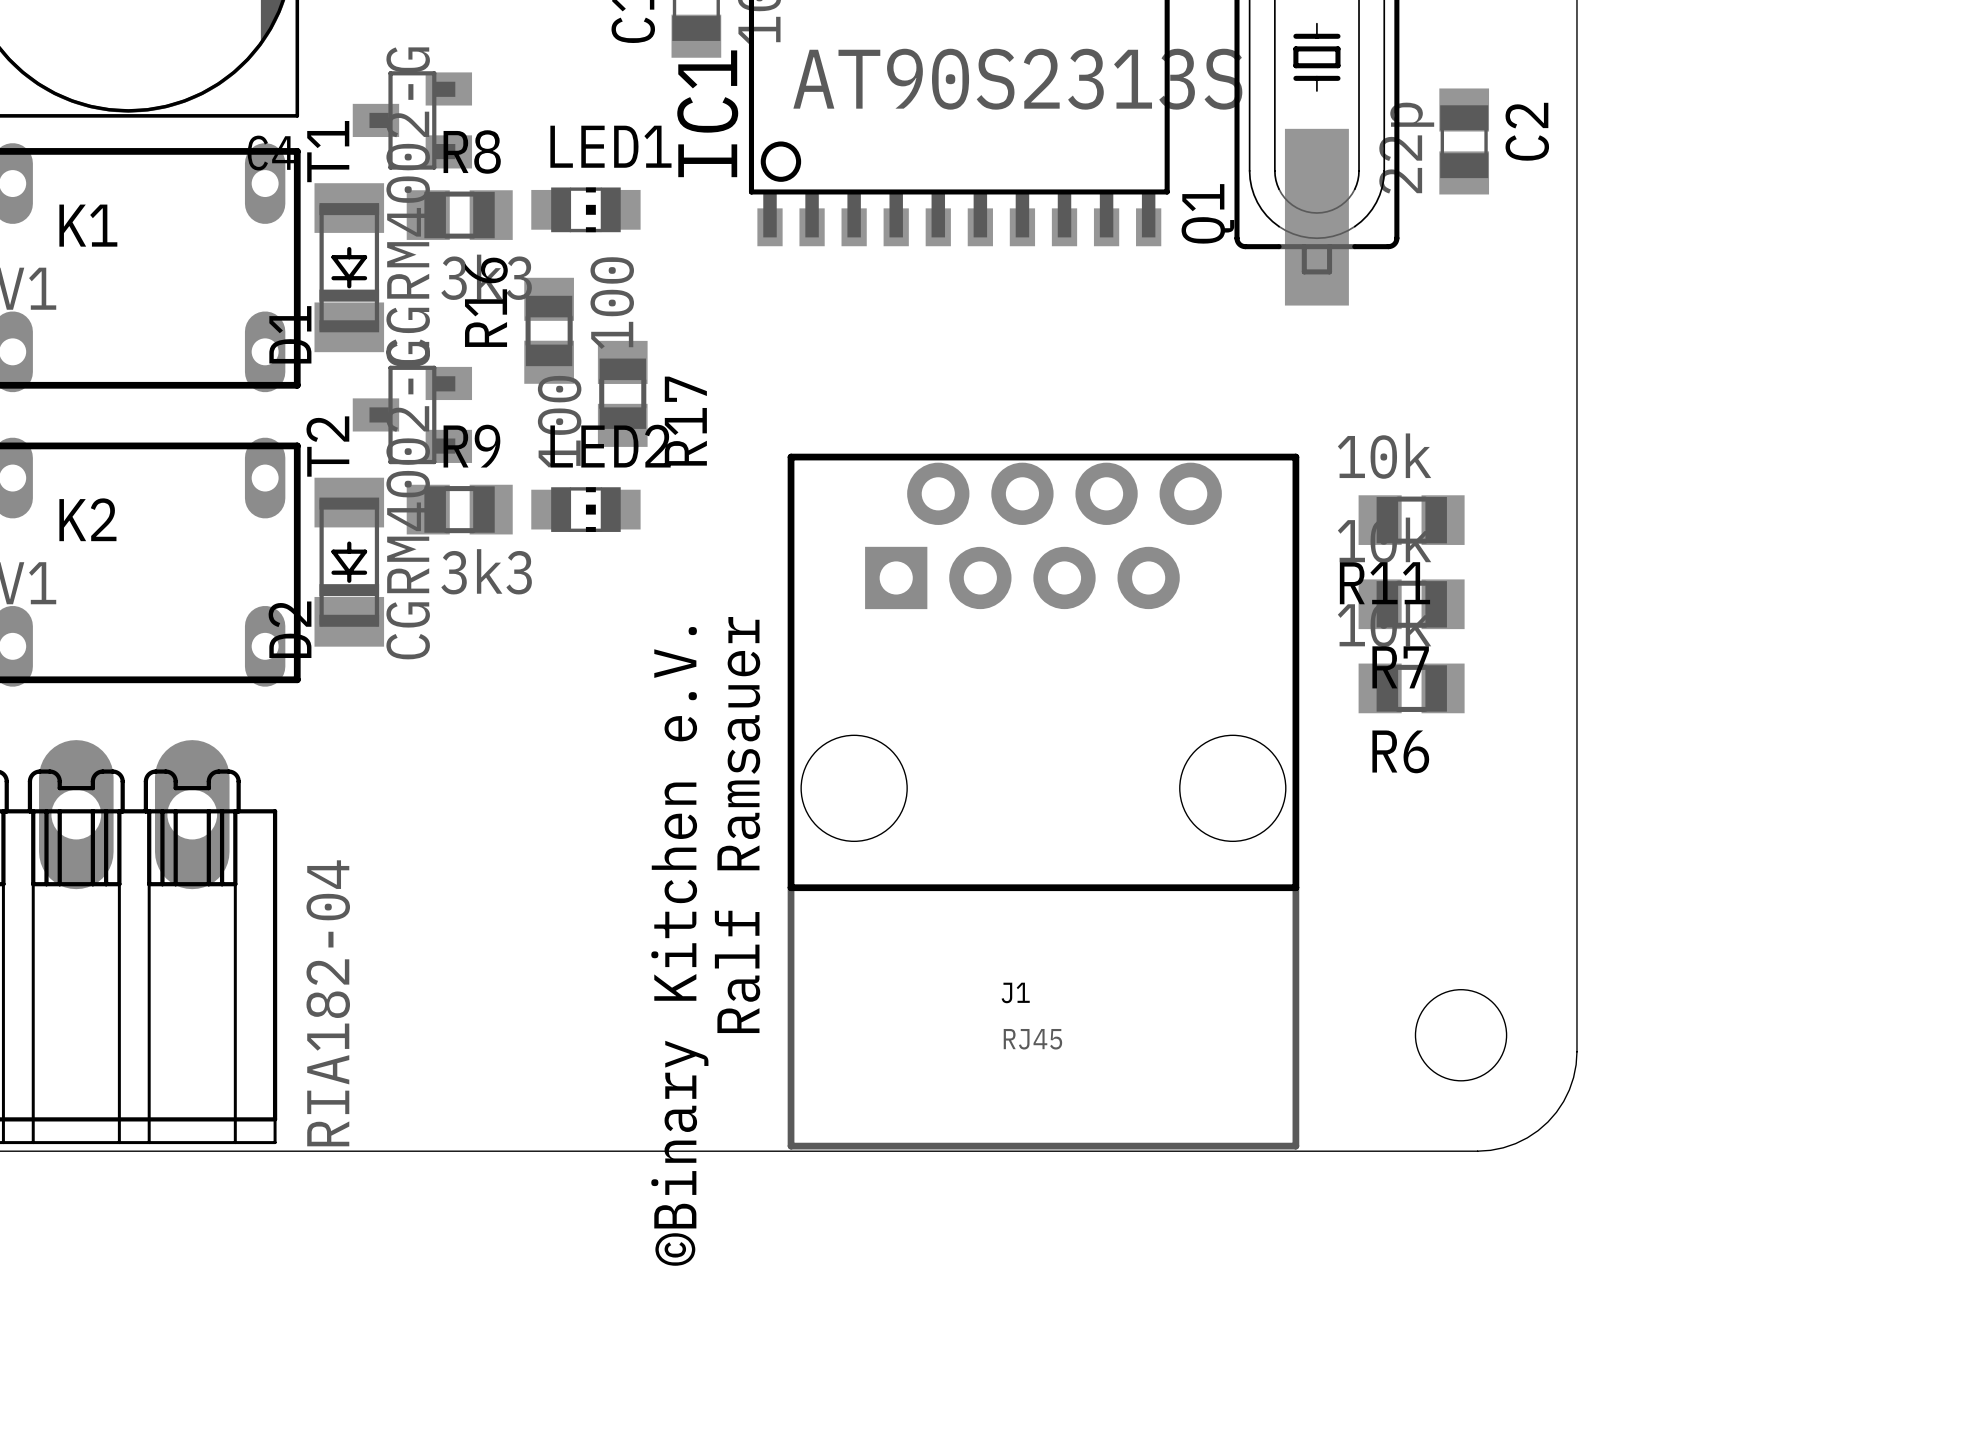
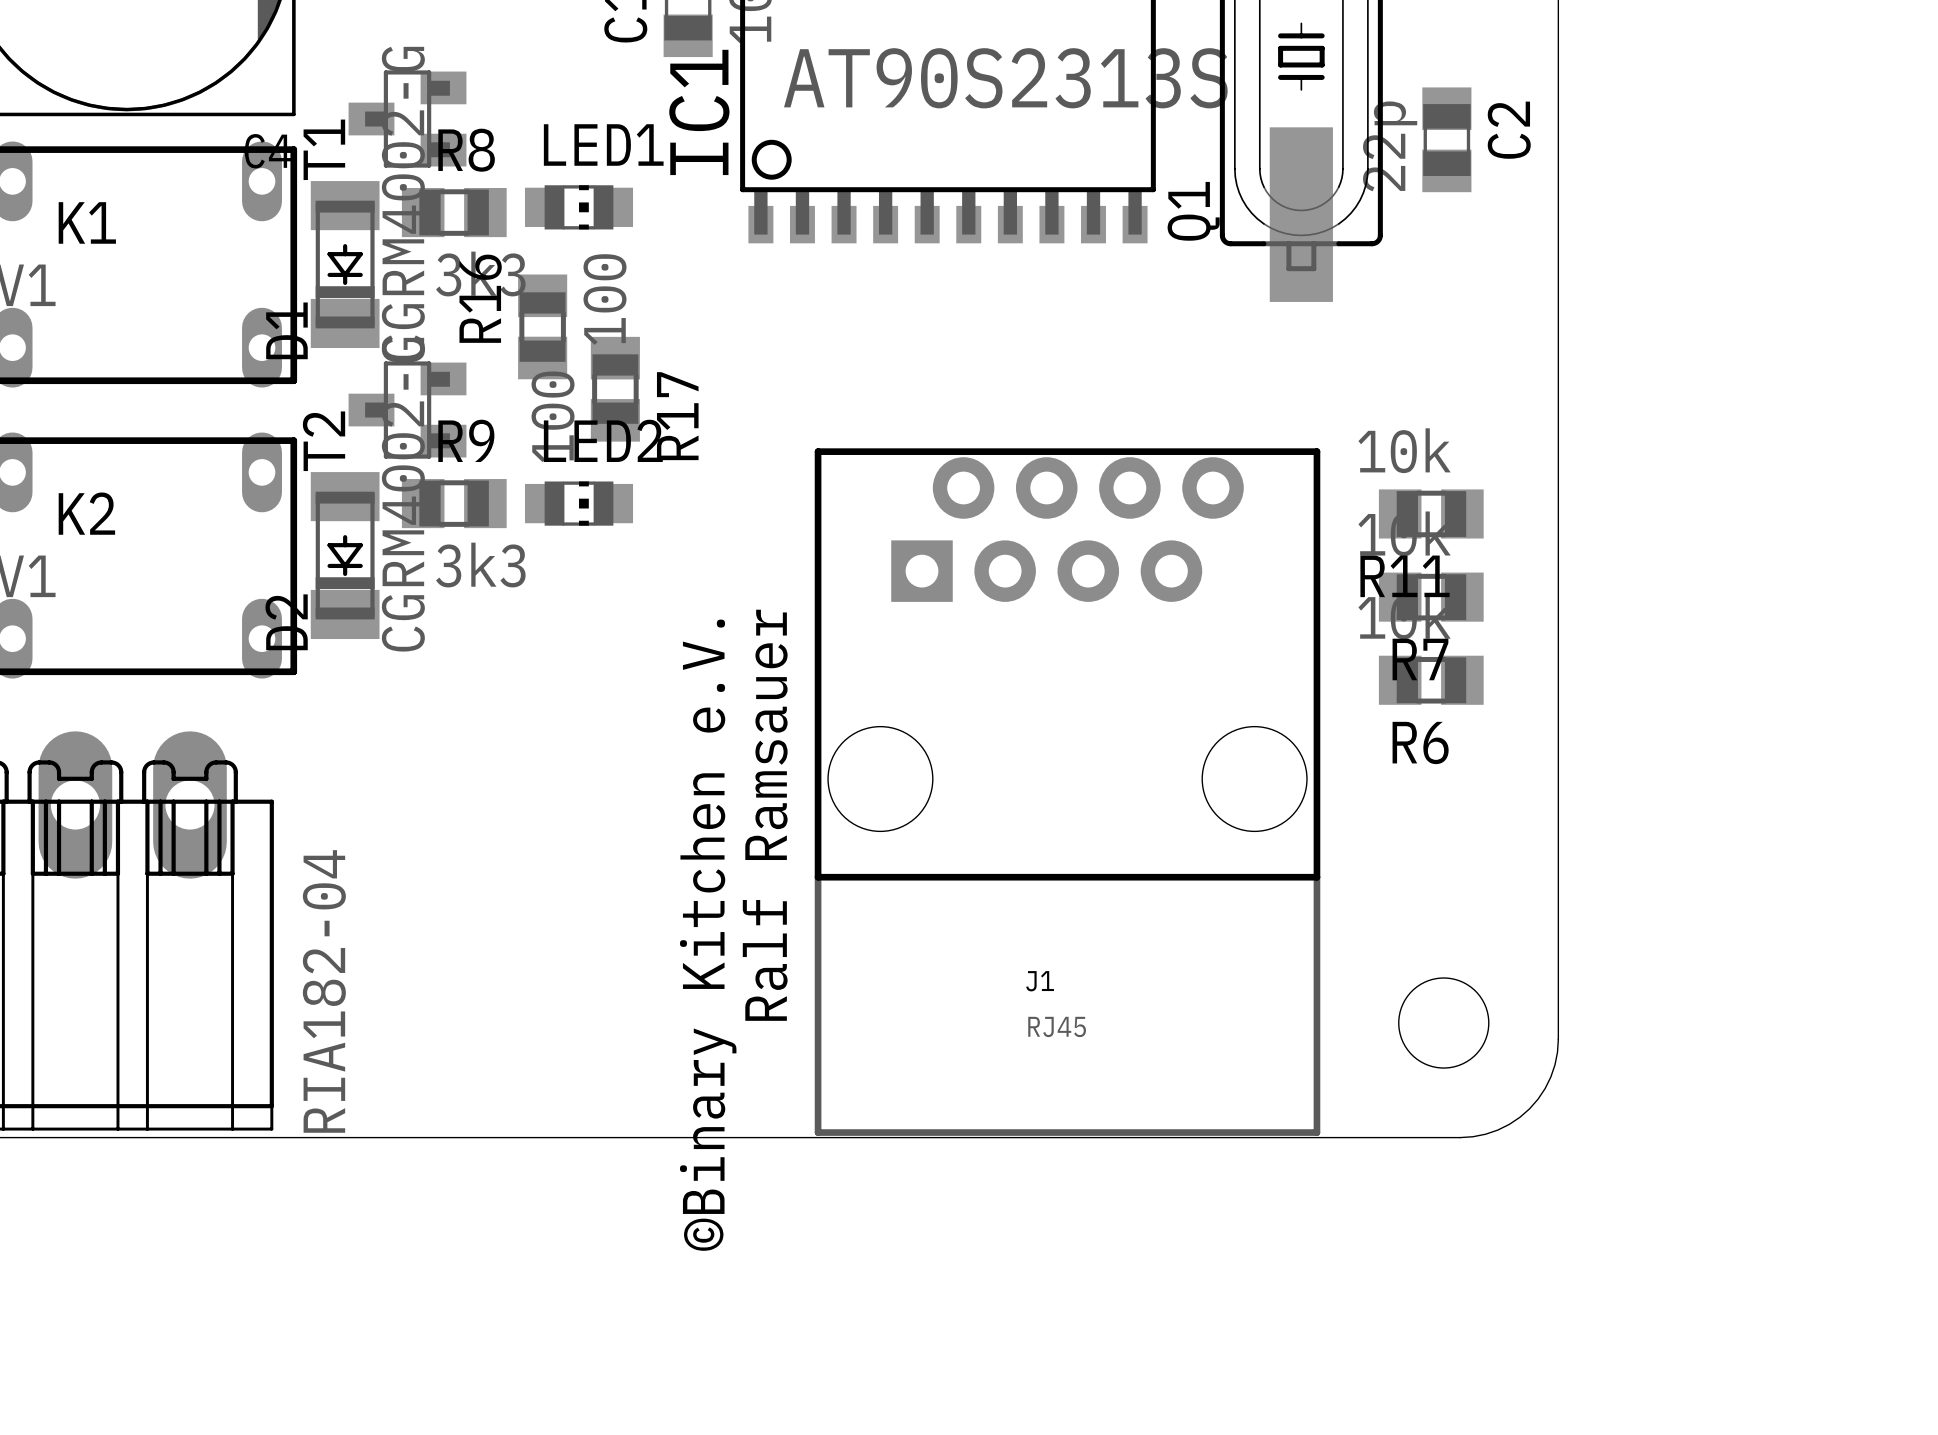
R11 position: (1411, 520) -> (1431, 513)
R7 position: (1411, 604) -> (1431, 597)
R6 position: (1411, 688) -> (1431, 680)
J1 position: (1043, 801) -> (1067, 792)
text position: Ralf Ramsauer (737, 825) -> Ralf Ramsauer (765, 815)
text position: ©Binary Kitchen e.V. (679, 946) -> ©Binary Kitchen e.V. (708, 935)

